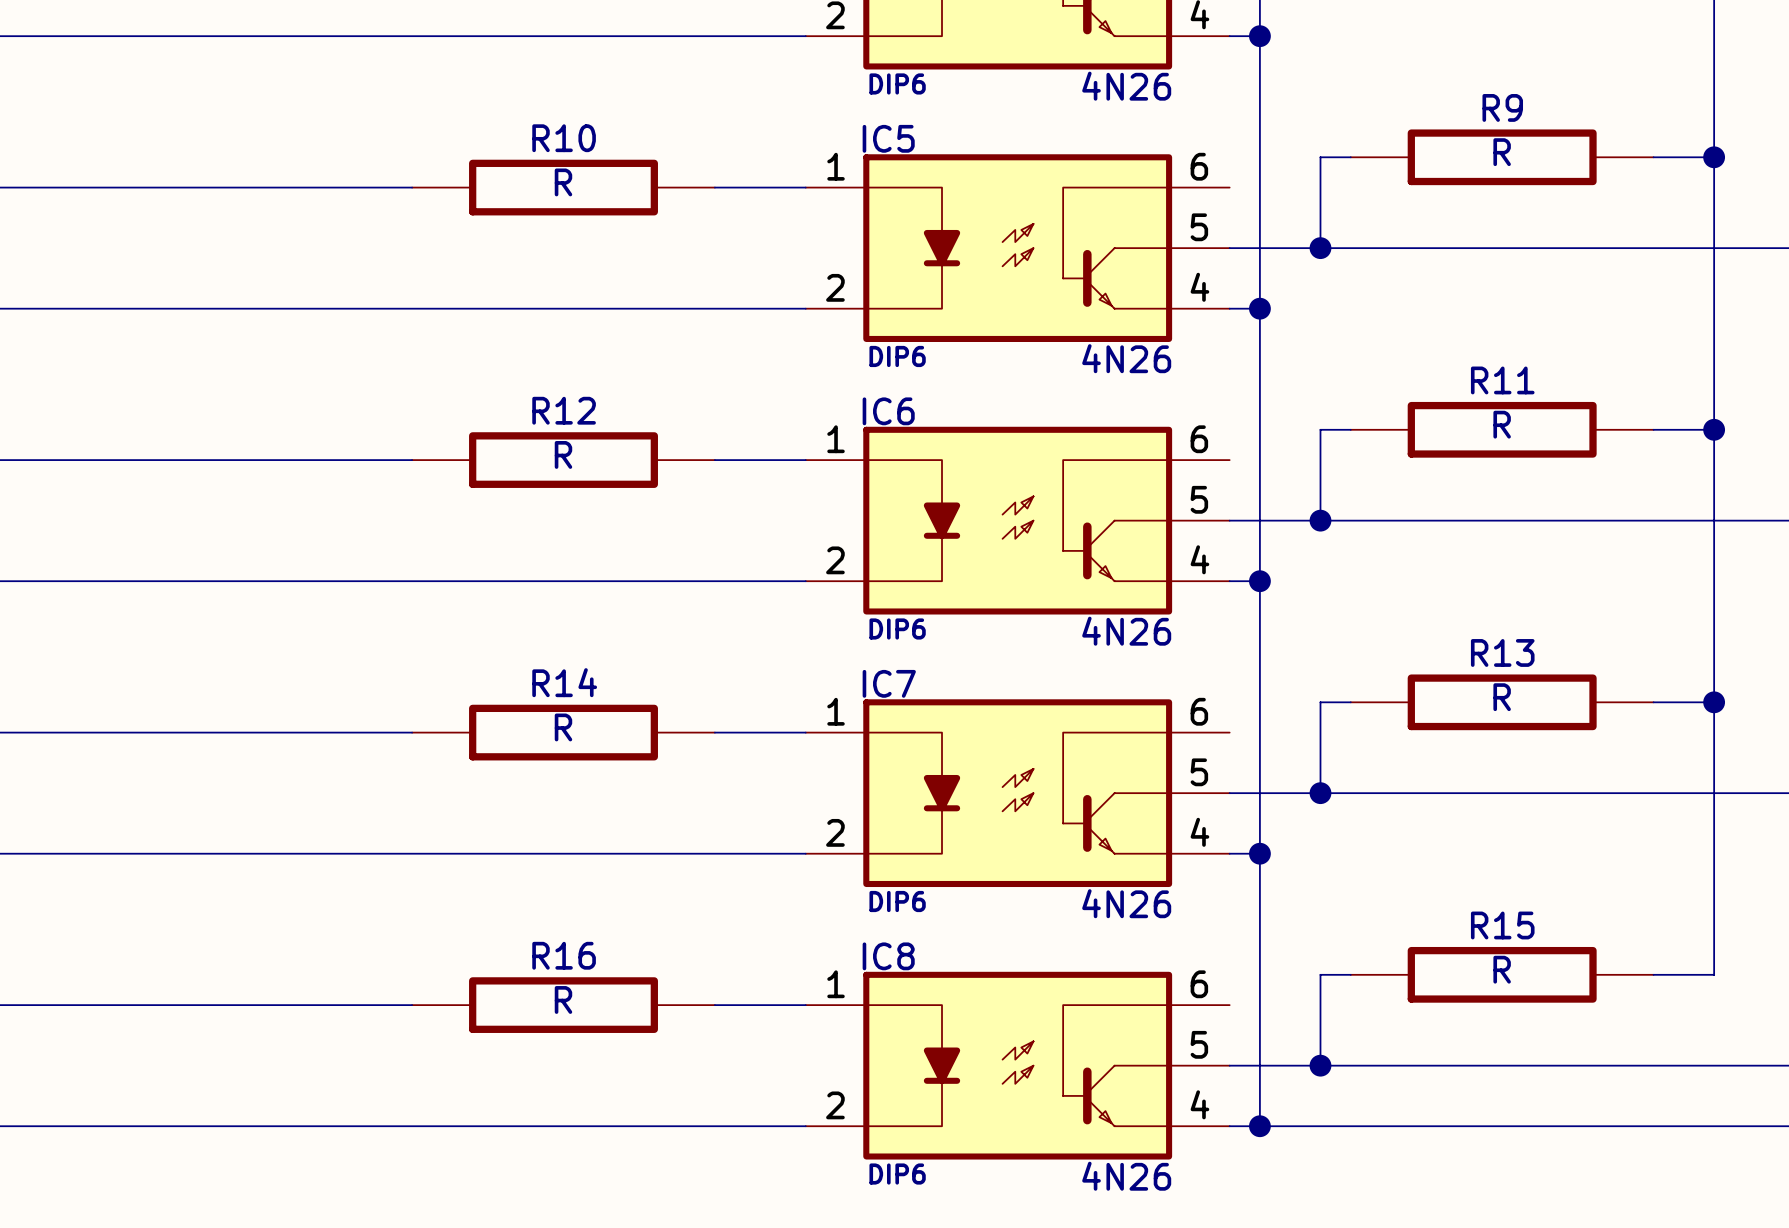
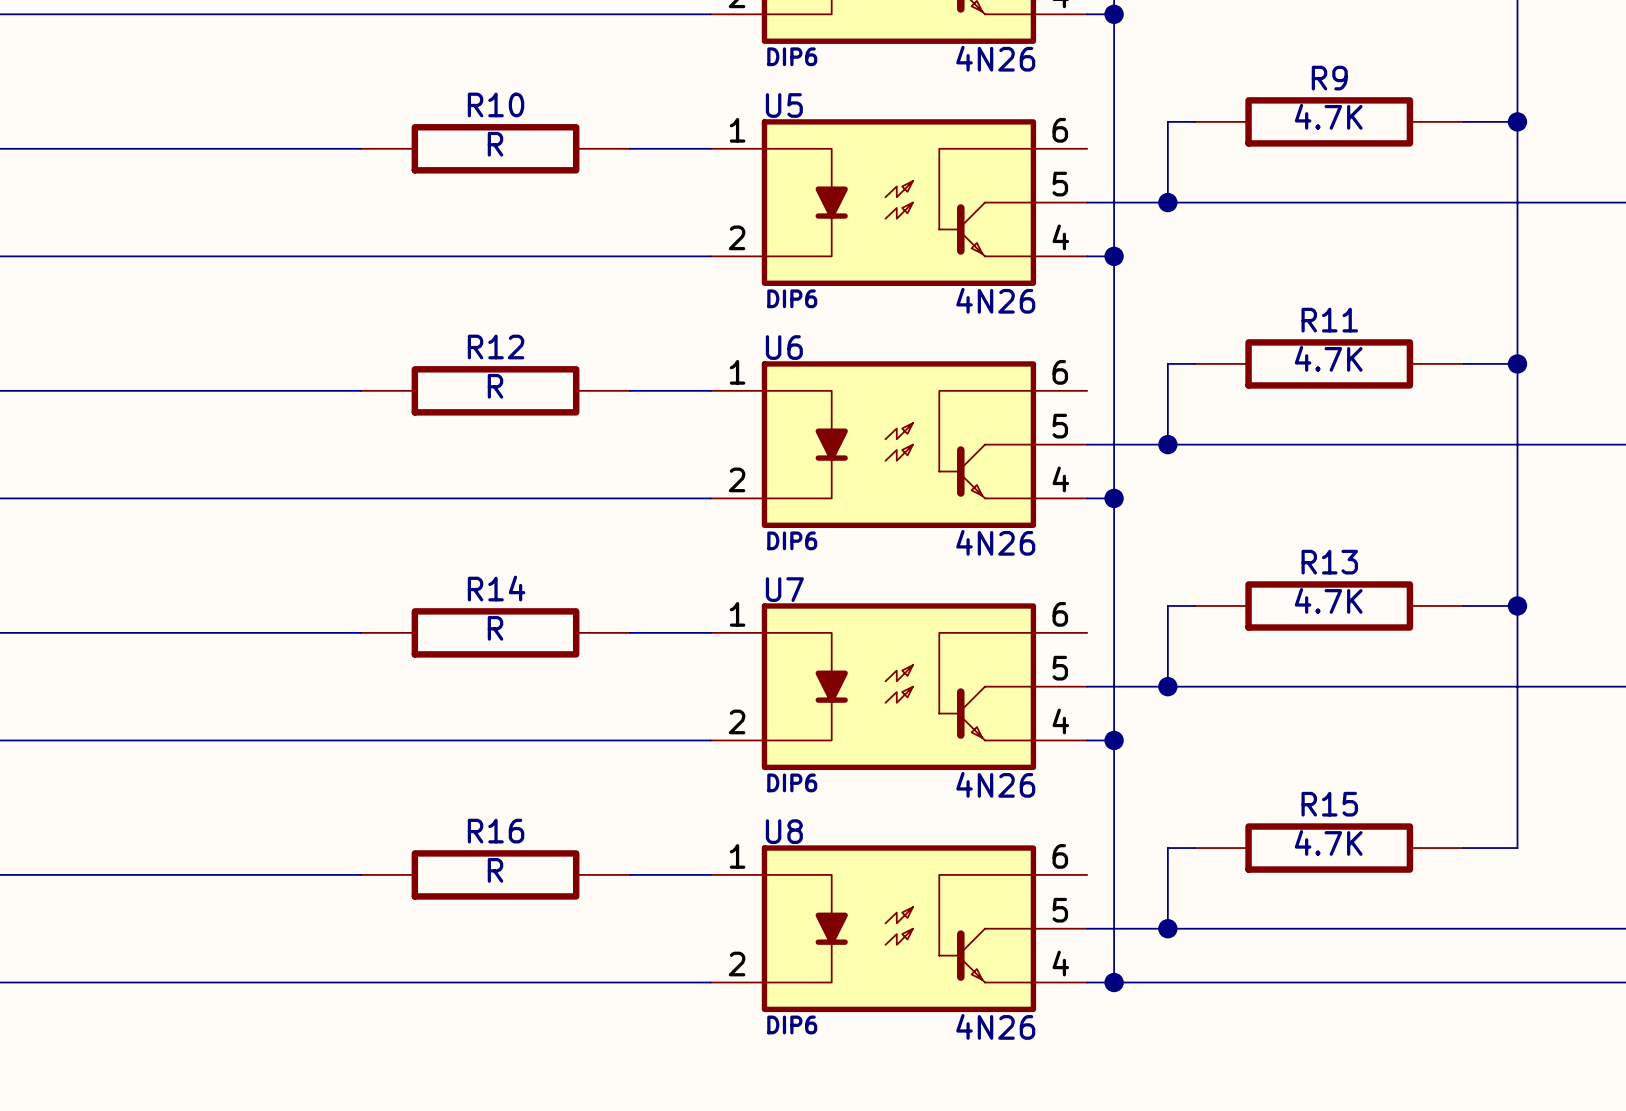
IC5 name: IC5 (888, 138) -> U5 (784, 105)
R9 value: R (1502, 152) -> 4.7K (1328, 116)
IC6 name: IC6 (888, 411) -> U6 (784, 347)
R11 value: R (1502, 424) -> 4.7K (1328, 358)
IC7 name: IC7 (889, 683) -> U7 (784, 589)
R13 value: R (1502, 697) -> 4.7K (1328, 600)
IC8 name: IC8 (888, 956) -> U8 (784, 831)
R15 value: R (1502, 969) -> 4.7K (1328, 842)

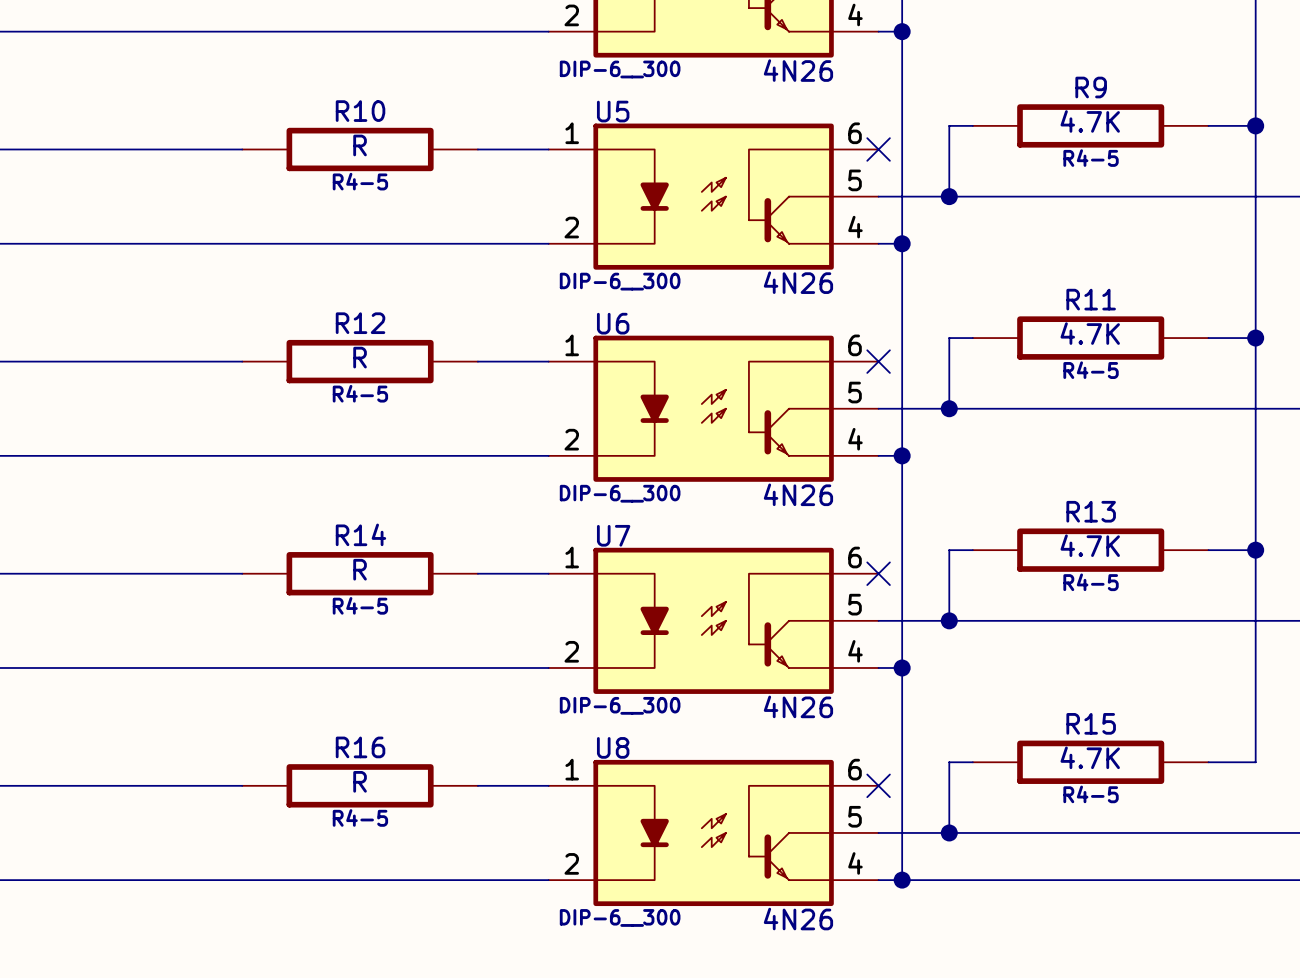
part text: DIP6 (792, 56) -> DIP-6__300 (620, 69)
no-connect mark: none -> (878, 149)
R9 text: none -> R4-5 (1091, 158)
R10 text: none -> R4-5 (360, 181)
U5 text: DIP6 (792, 298) -> DIP-6__300 (620, 281)
no-connect mark: none -> (878, 361)
R11 text: none -> R4-5 (1091, 370)
R12 text: none -> R4-5 (360, 393)
U6 text: DIP6 (792, 540) -> DIP-6__300 (620, 493)
no-connect mark: none -> (878, 573)
R13 text: none -> R4-5 (1091, 582)
R14 text: none -> R4-5 (360, 605)
U7 text: DIP6 (792, 782) -> DIP-6__300 (620, 705)
no-connect mark: none -> (878, 785)
R15 text: none -> R4-5 (1091, 794)
R16 text: none -> R4-5 (360, 817)
U8 text: DIP6 (792, 1024) -> DIP-6__300 (620, 917)

